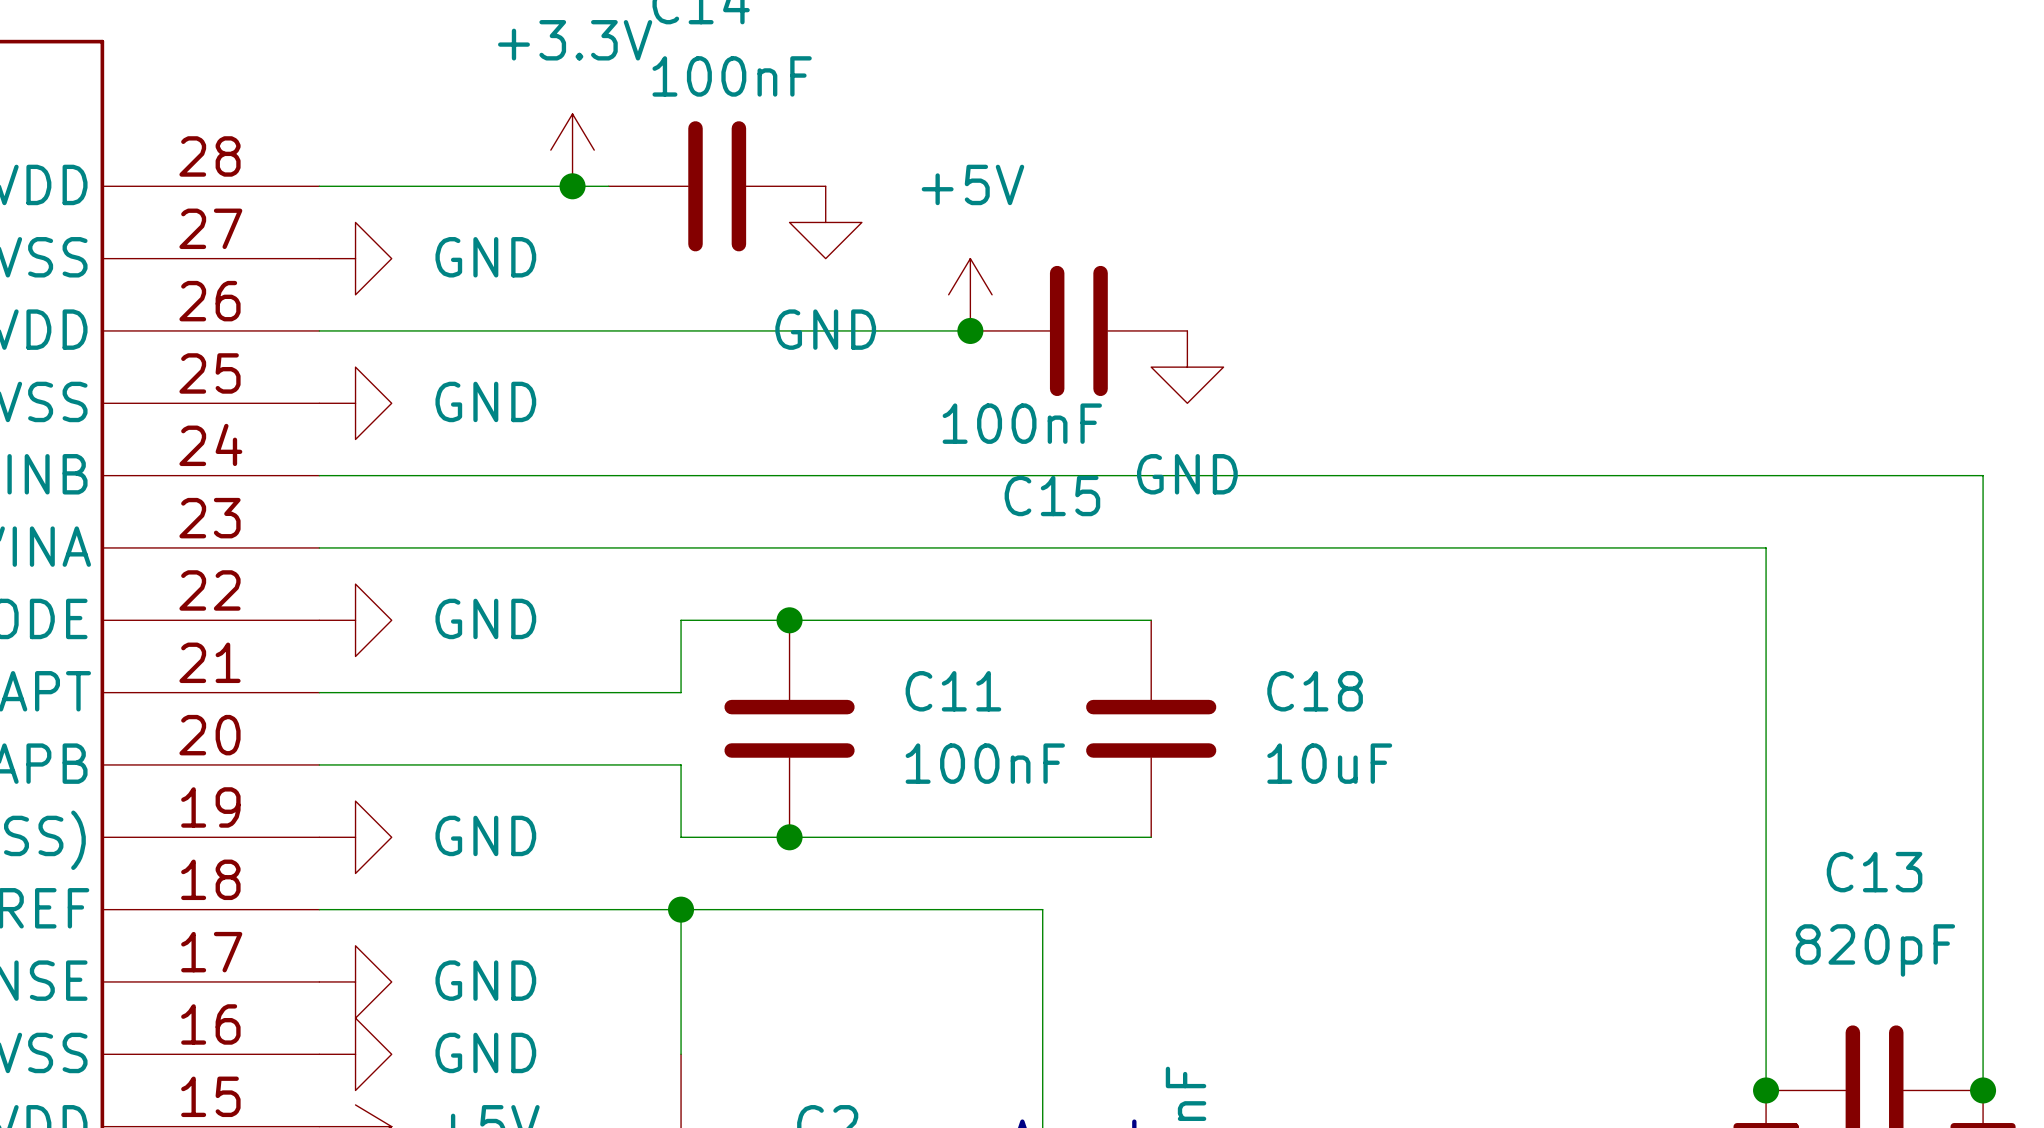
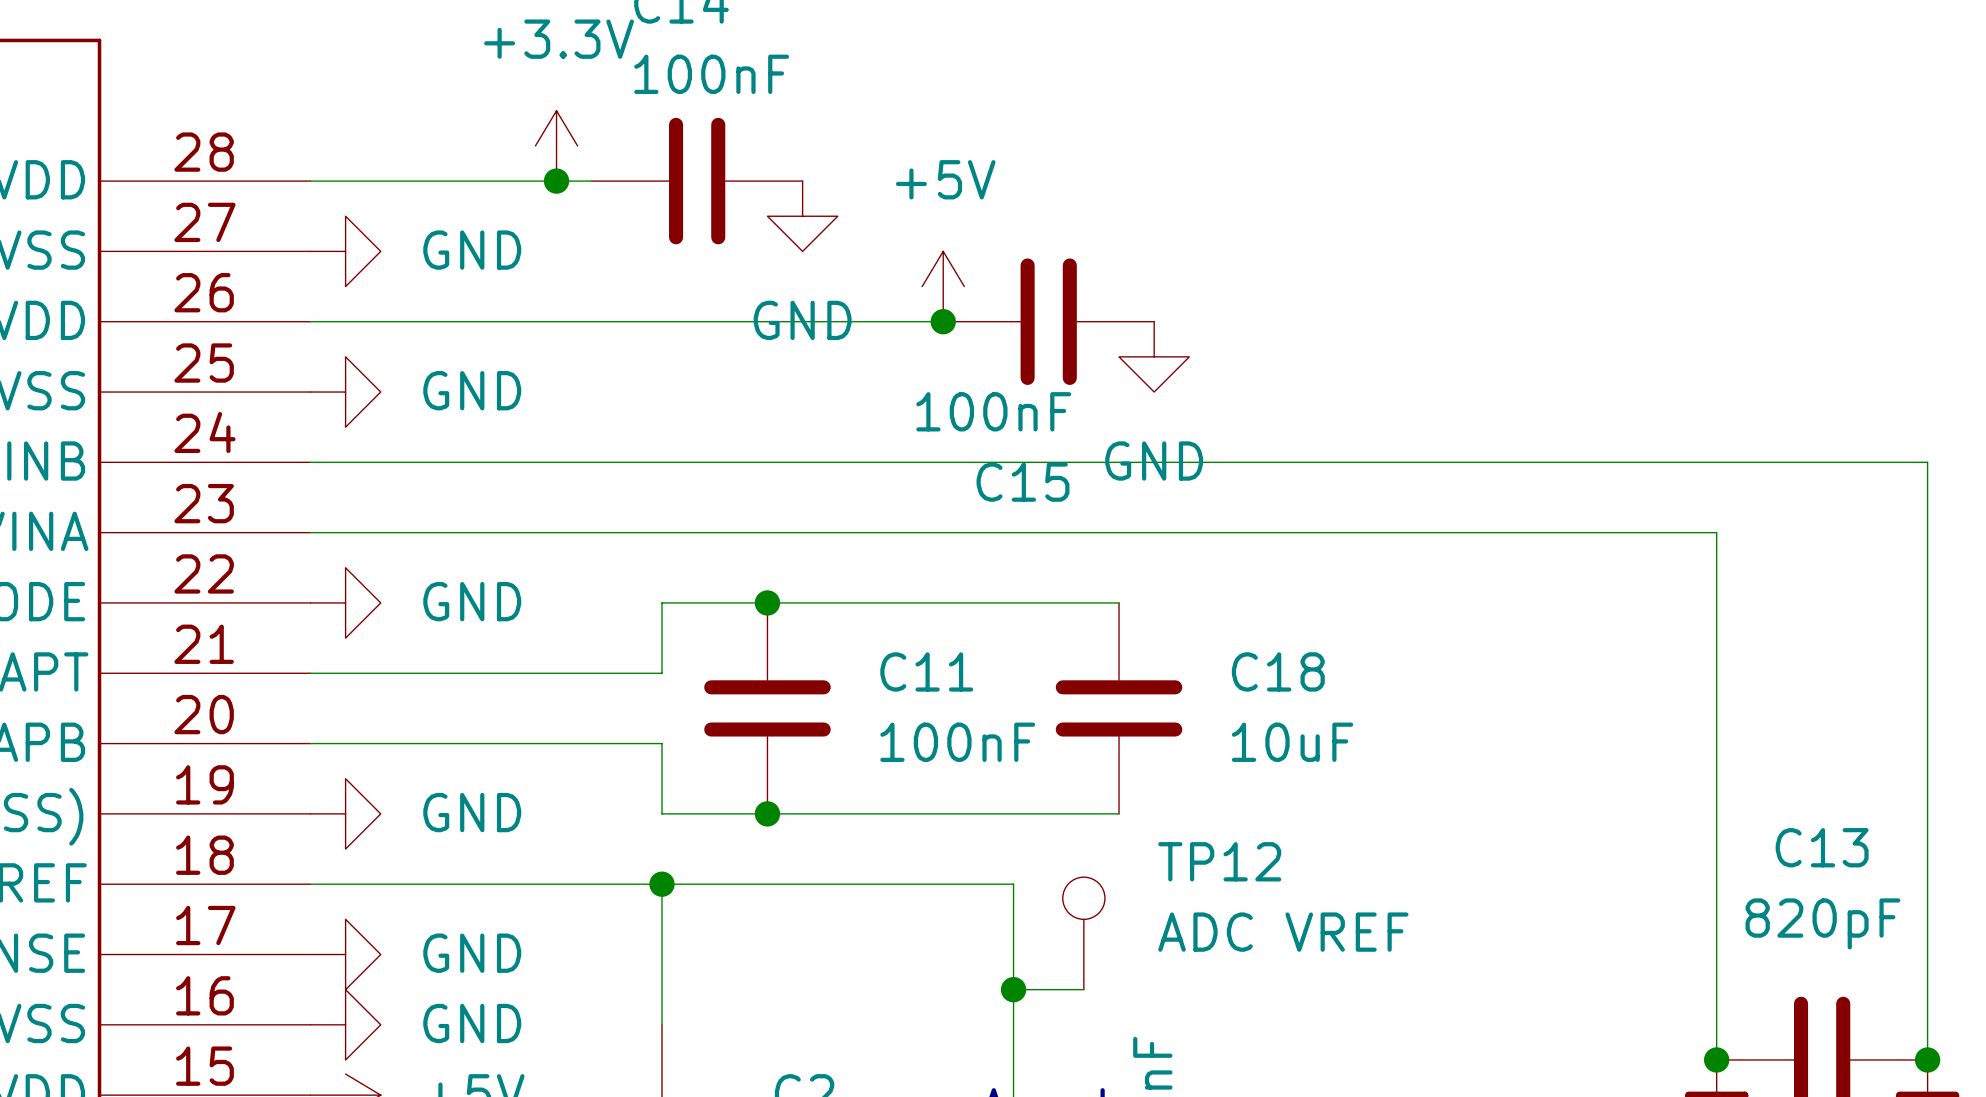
TP12: none -> ADC VREF (1083, 933)
wire: none -> (1013, 989) (1083, 989)
junction: none -> (1013, 989)

